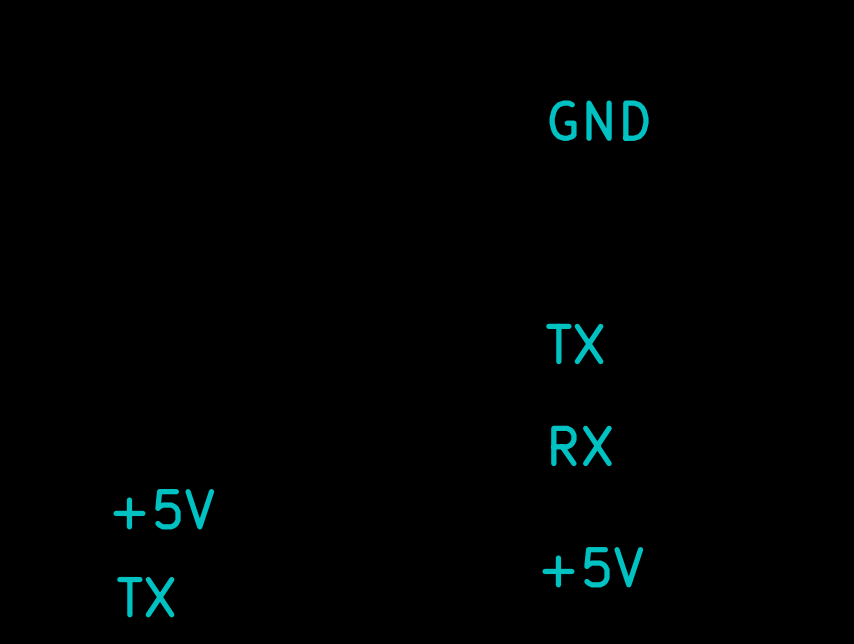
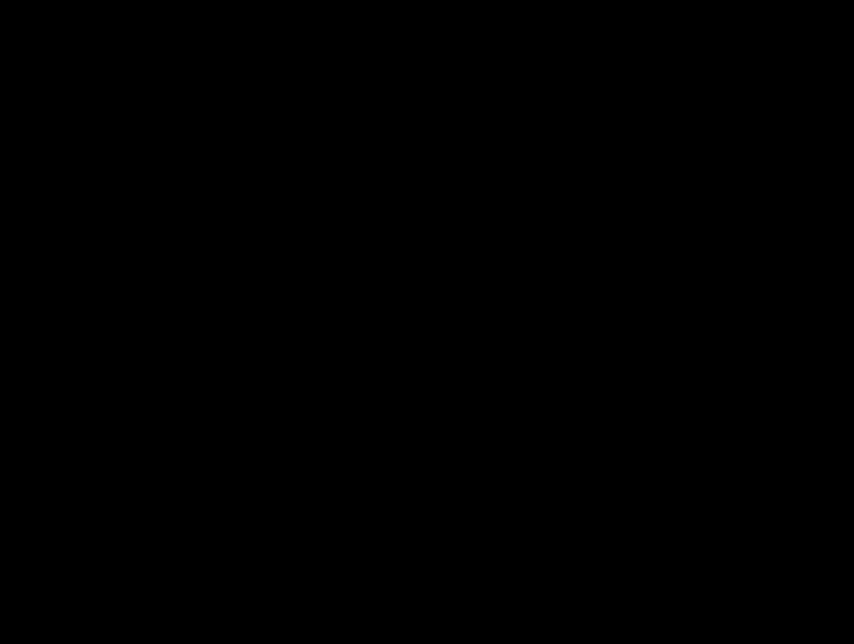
text: GND (599, 120) -> none
text: TX (574, 343) -> none
text: RX (581, 445) -> none
text: +5V (163, 509) -> none
text: +5V (592, 567) -> none
text: TX (145, 597) -> none

